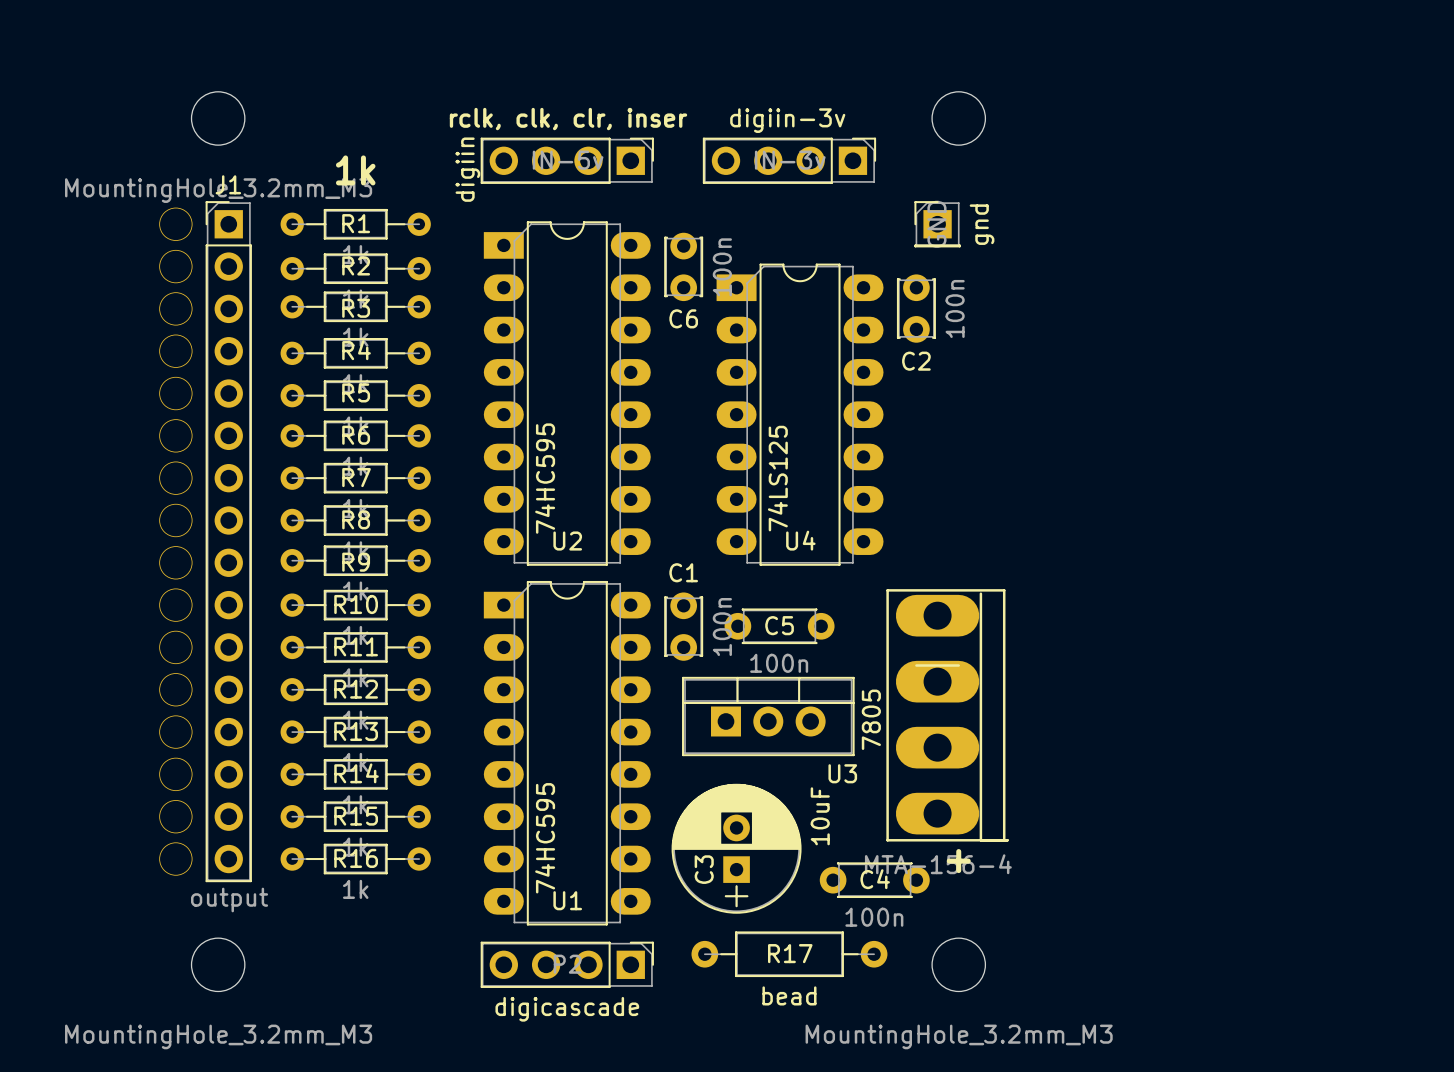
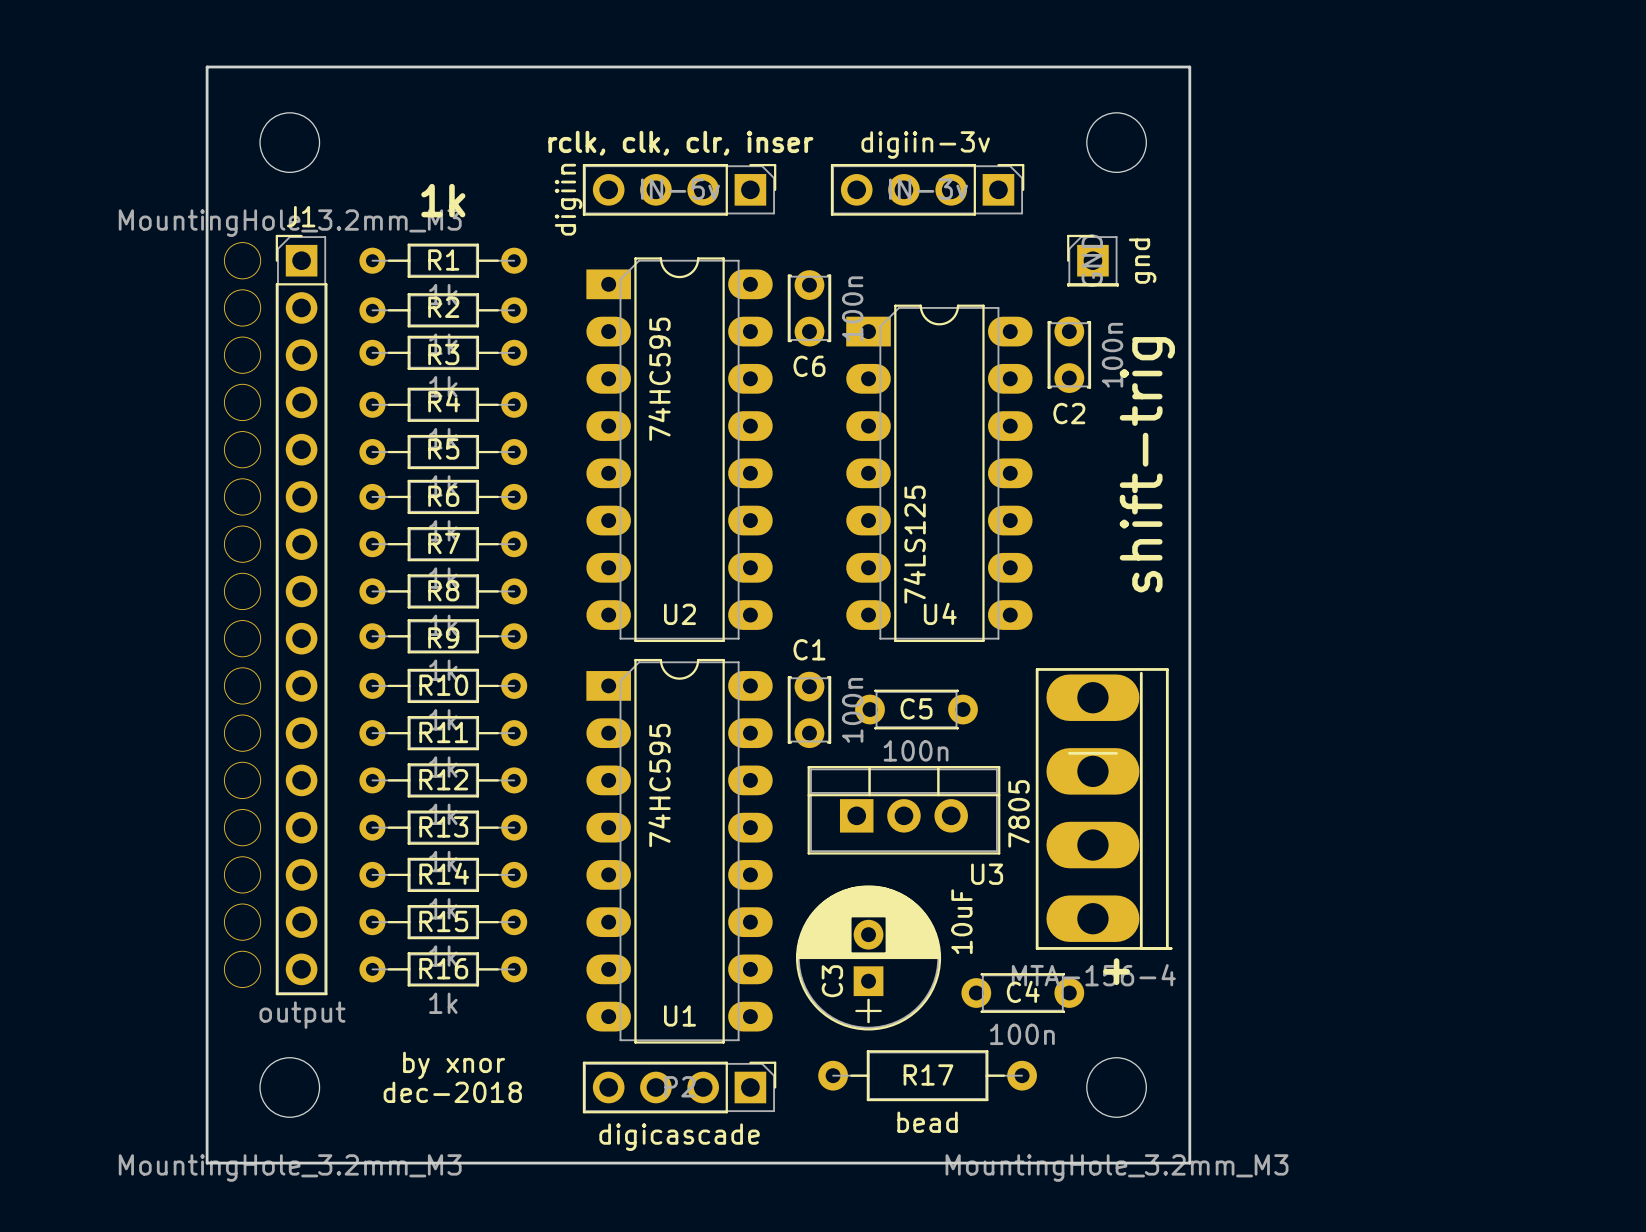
board edge: none -> (207, 67) (1189, 67) (1189, 1163) (207, 1163) (207, 67)
text: none -> shift-trig (1147, 464)
U2 value position: 74HC595 (545, 478) -> 74HC595 (659, 379)
U1 value position: 74HC595 (545, 838) -> 74HC595 (659, 785)
text: none -> by xnor (454, 1065)
text: none -> dec-2018 (452, 1092)

